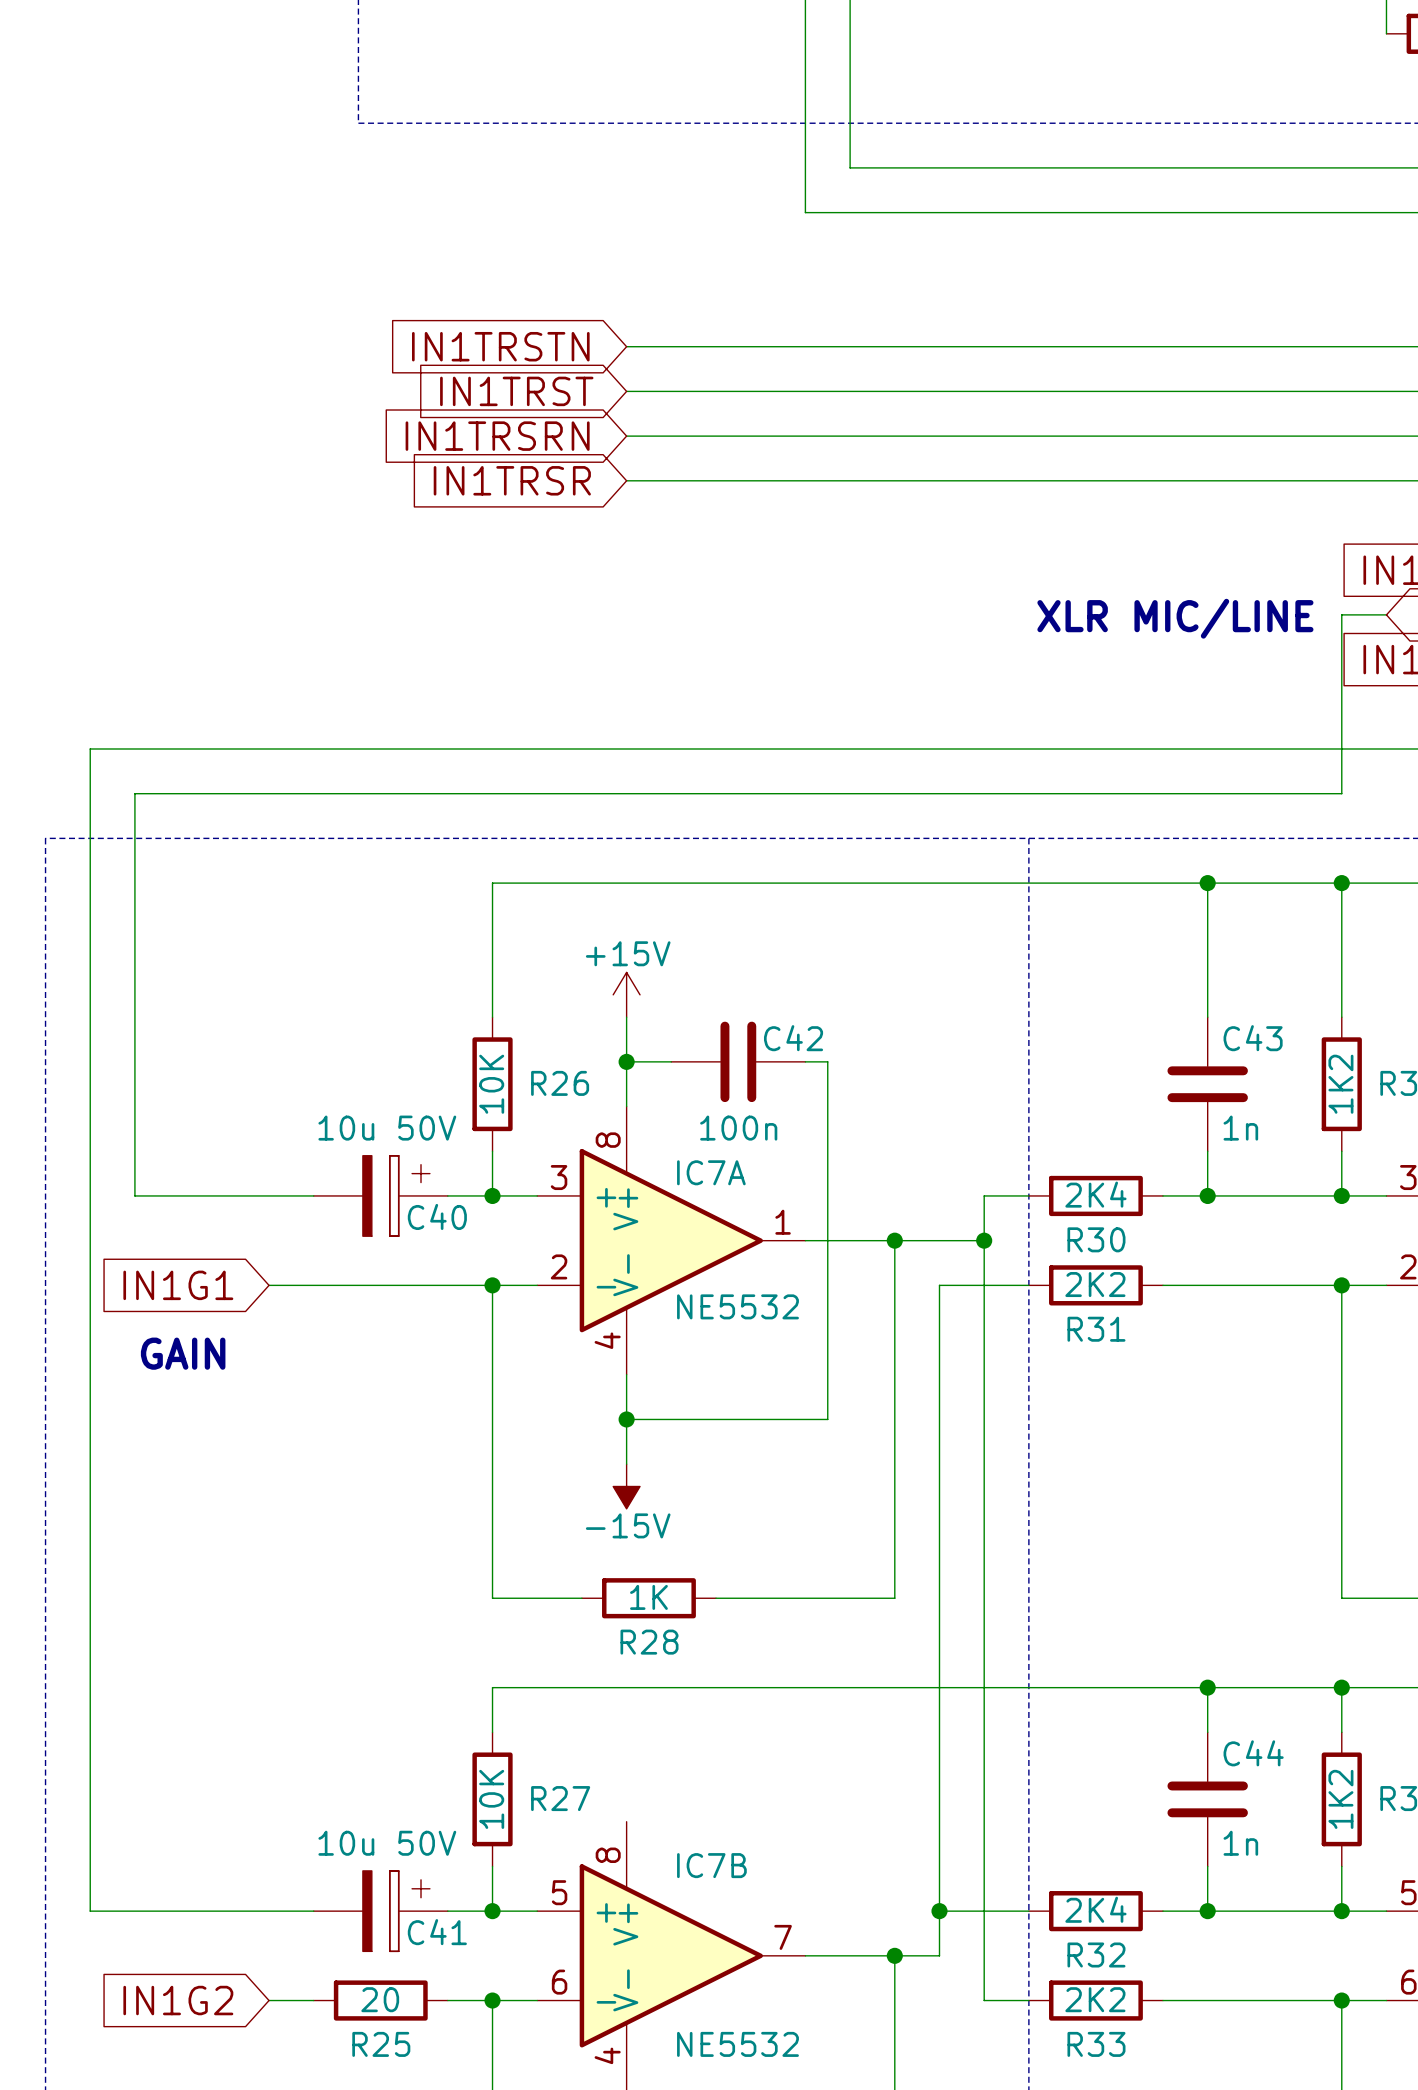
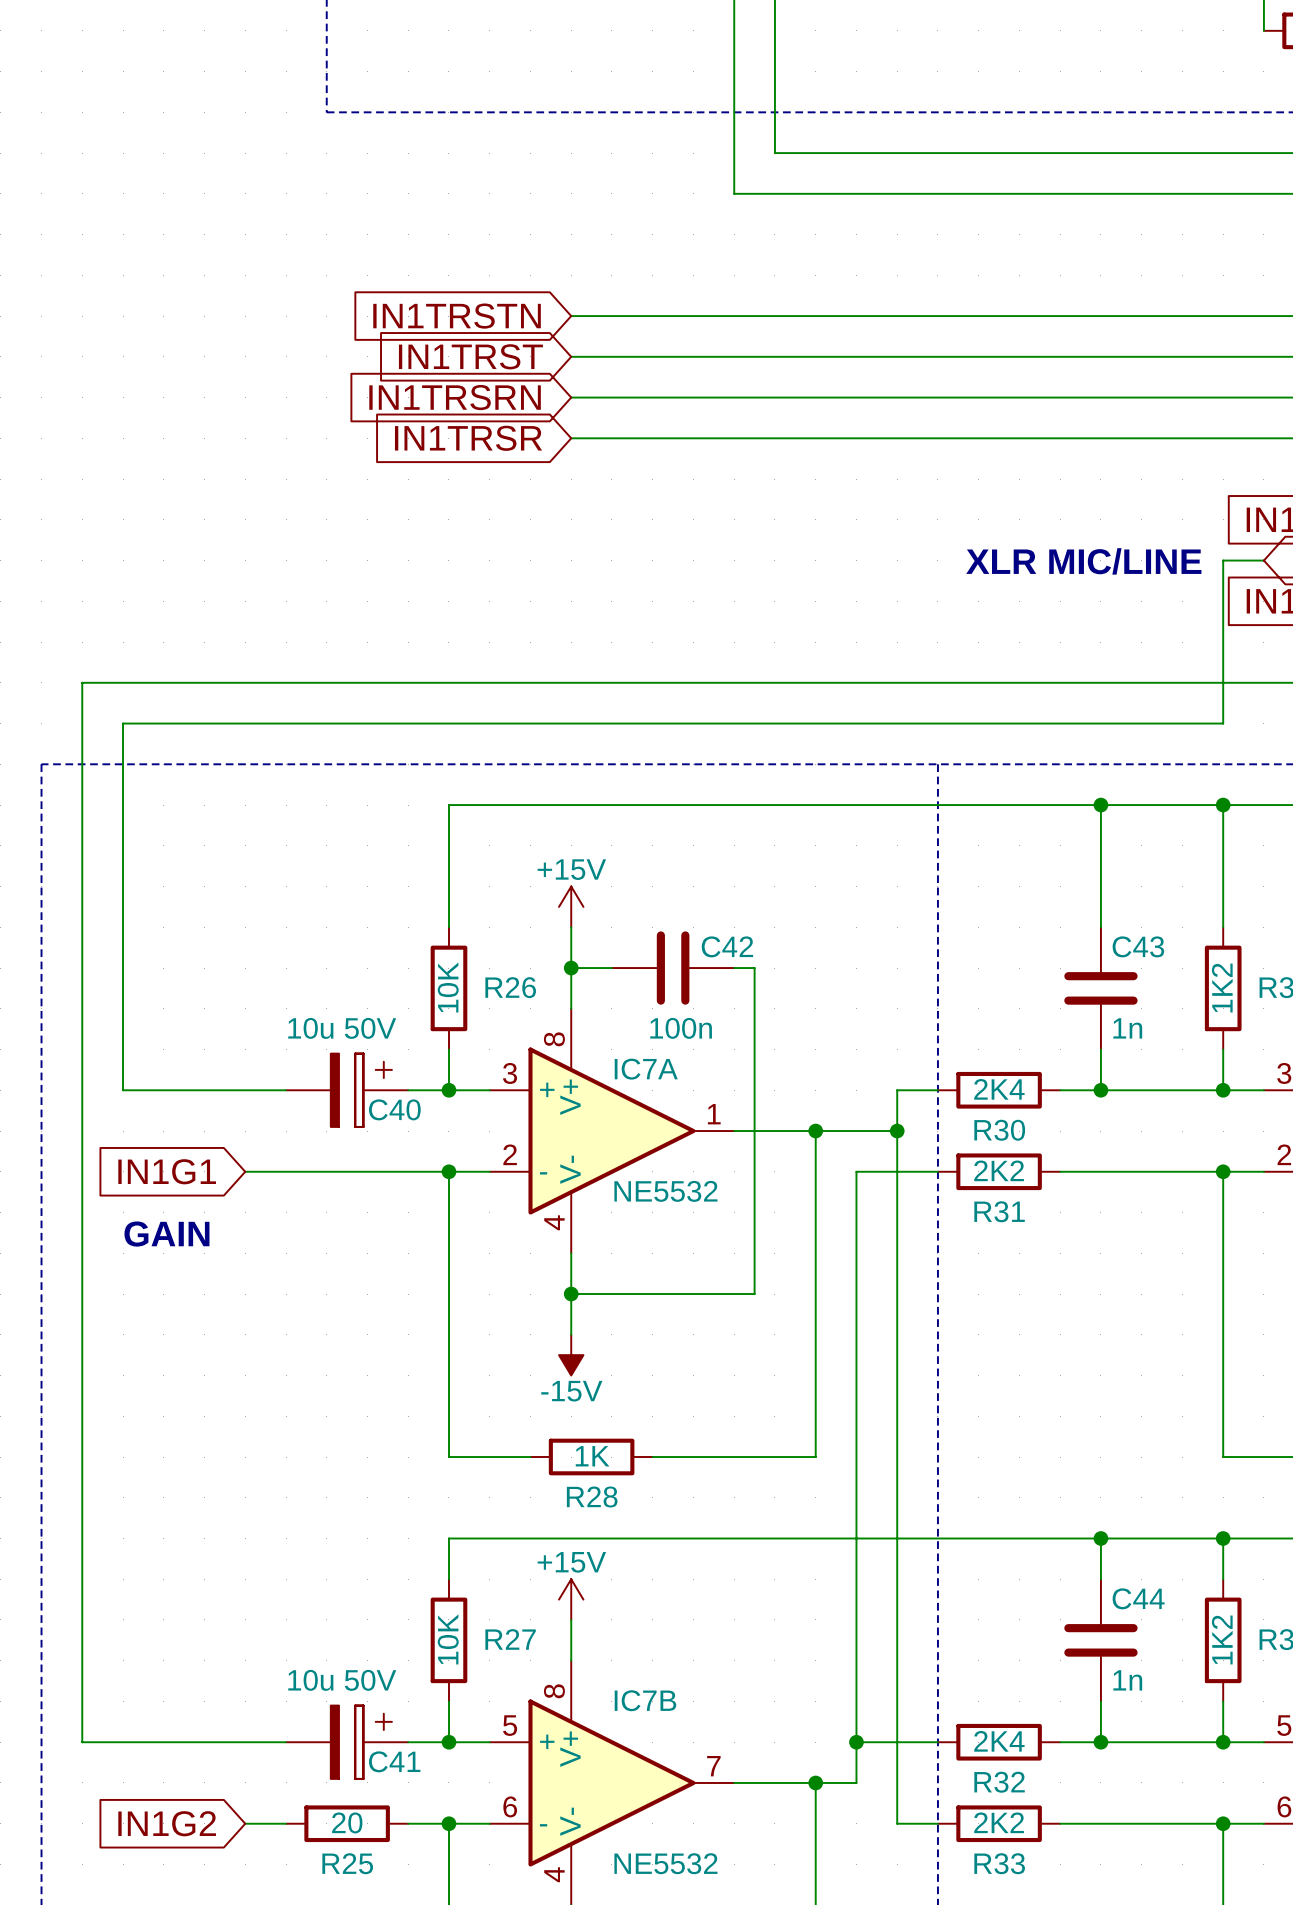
power symbol: none -> +15V (571, 1599)
wire: none -> (571, 1619) (571, 1660)

